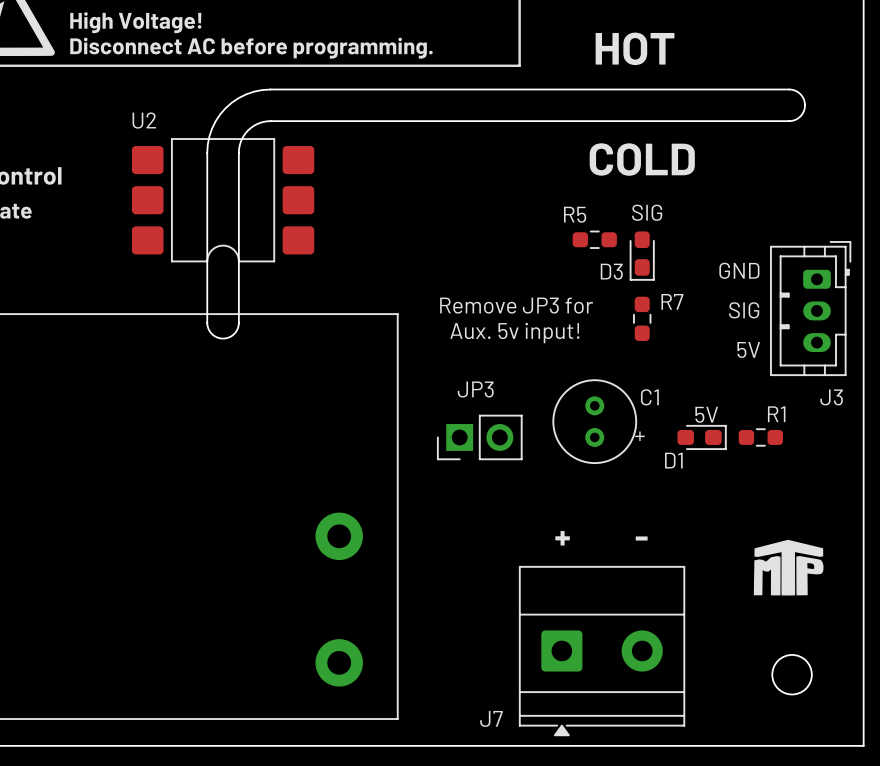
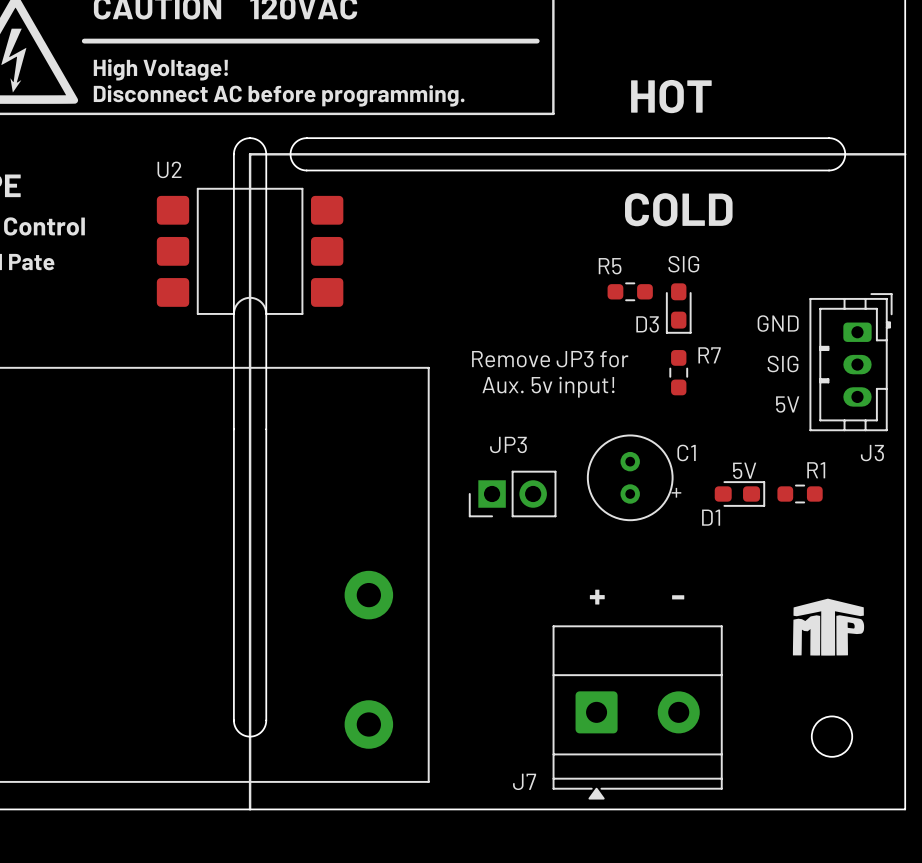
board edge: (278, 89) (262, 90) (246, 94) (225, 108) (212, 128) (207, 152) -> (266, 202) (265, 150) (260, 141) (250, 138) (240, 141) (234, 150) (233, 202)
line: none -> (905, 154) (250, 154) (250, 809)
board edge: (278, 121) (263, 121) (250, 128) (242, 139) (238, 152) -> (306, 170) (295, 165) (290, 154) (295, 142) (306, 138)
board edge: (207, 322) (211, 333) (223, 338) (234, 333) (238, 322) -> (233, 376) (233, 720) (238, 731) (250, 736) (261, 731) (266, 720) (266, 376)

